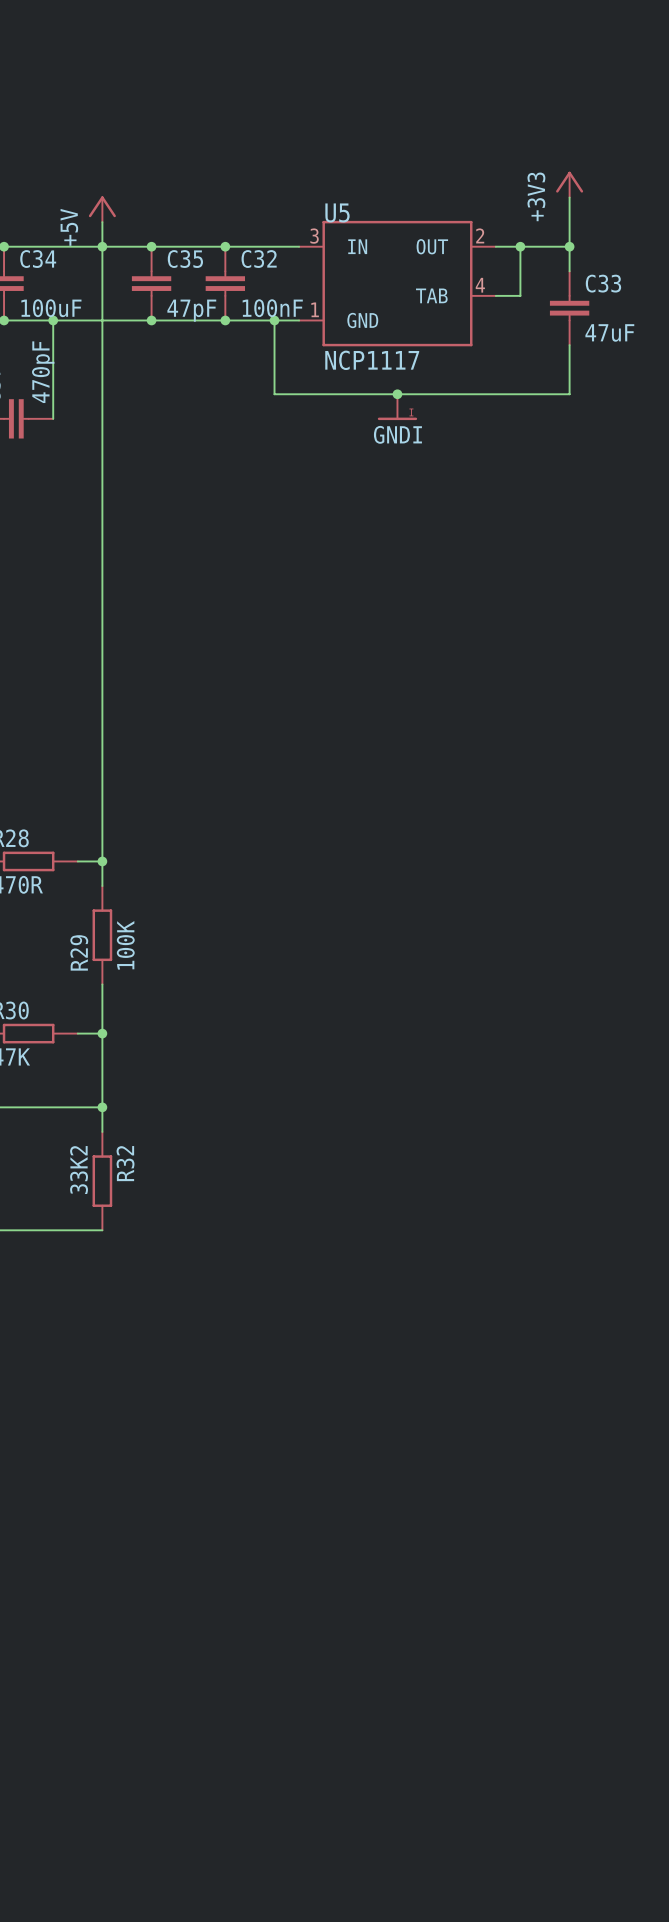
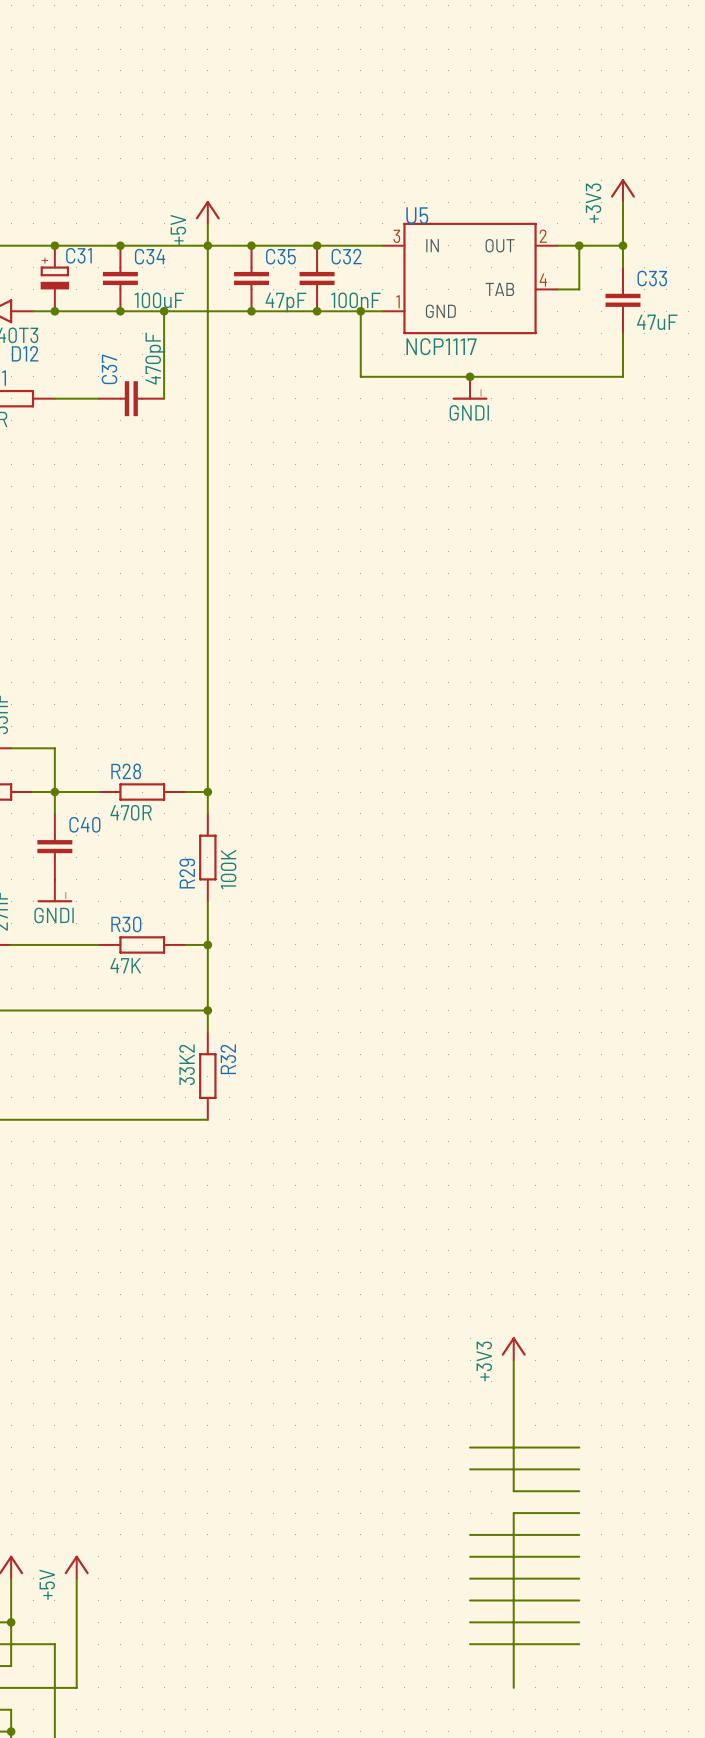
power symbol: none -> +3V3 (513, 1348)
wire: none -> (513, 1360) (513, 1491) (579, 1491)
wire: none -> (470, 1447) (579, 1447)
wire: none -> (470, 1469) (579, 1469)
wire: none -> (579, 1513) (513, 1513) (513, 1687)
wire: none -> (470, 1534) (579, 1534)
wire: none -> (470, 1556) (579, 1556)
wire: none -> (470, 1578) (579, 1578)
wire: none -> (470, 1600) (579, 1600)
wire: none -> (470, 1622) (579, 1622)
wire: none -> (470, 1644) (579, 1644)

